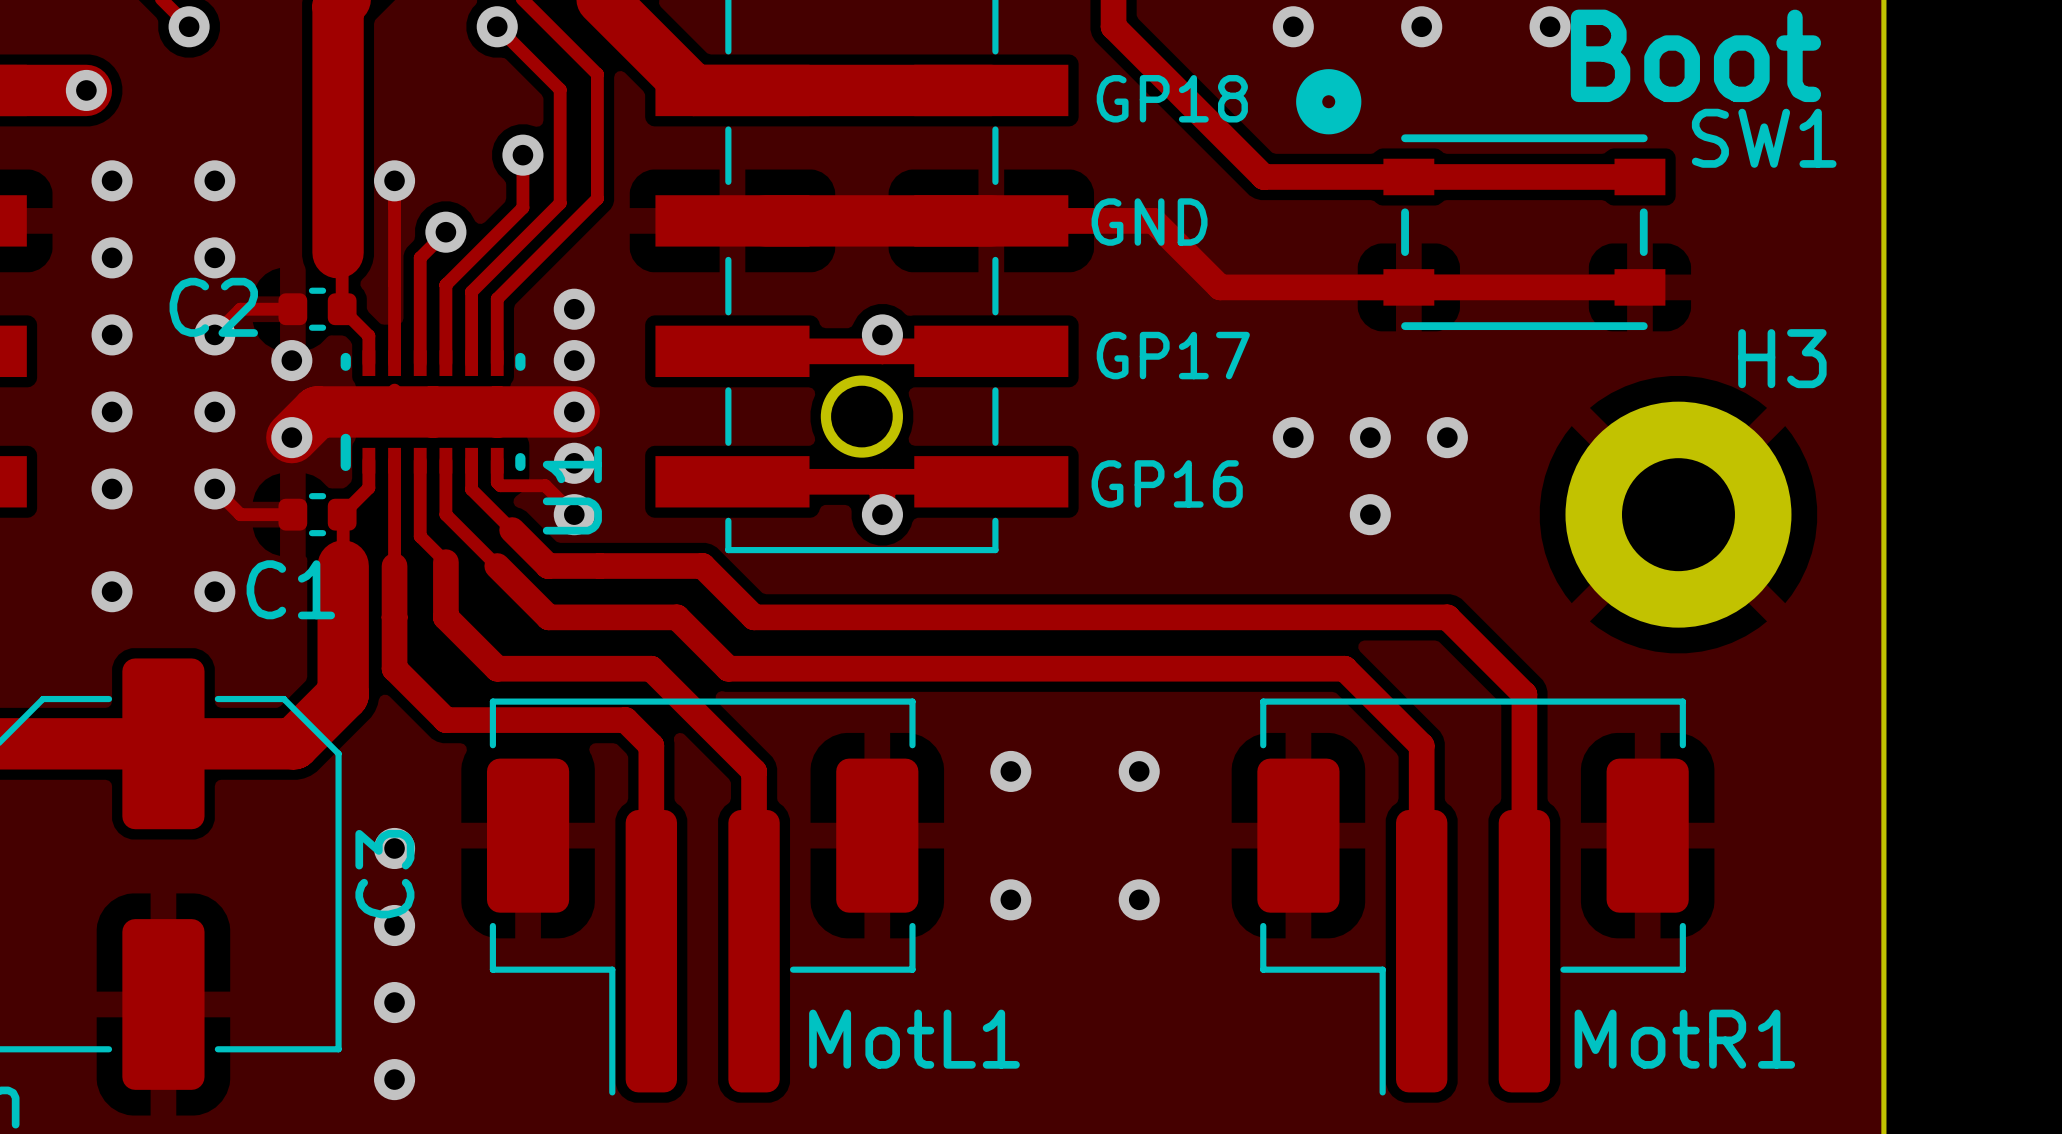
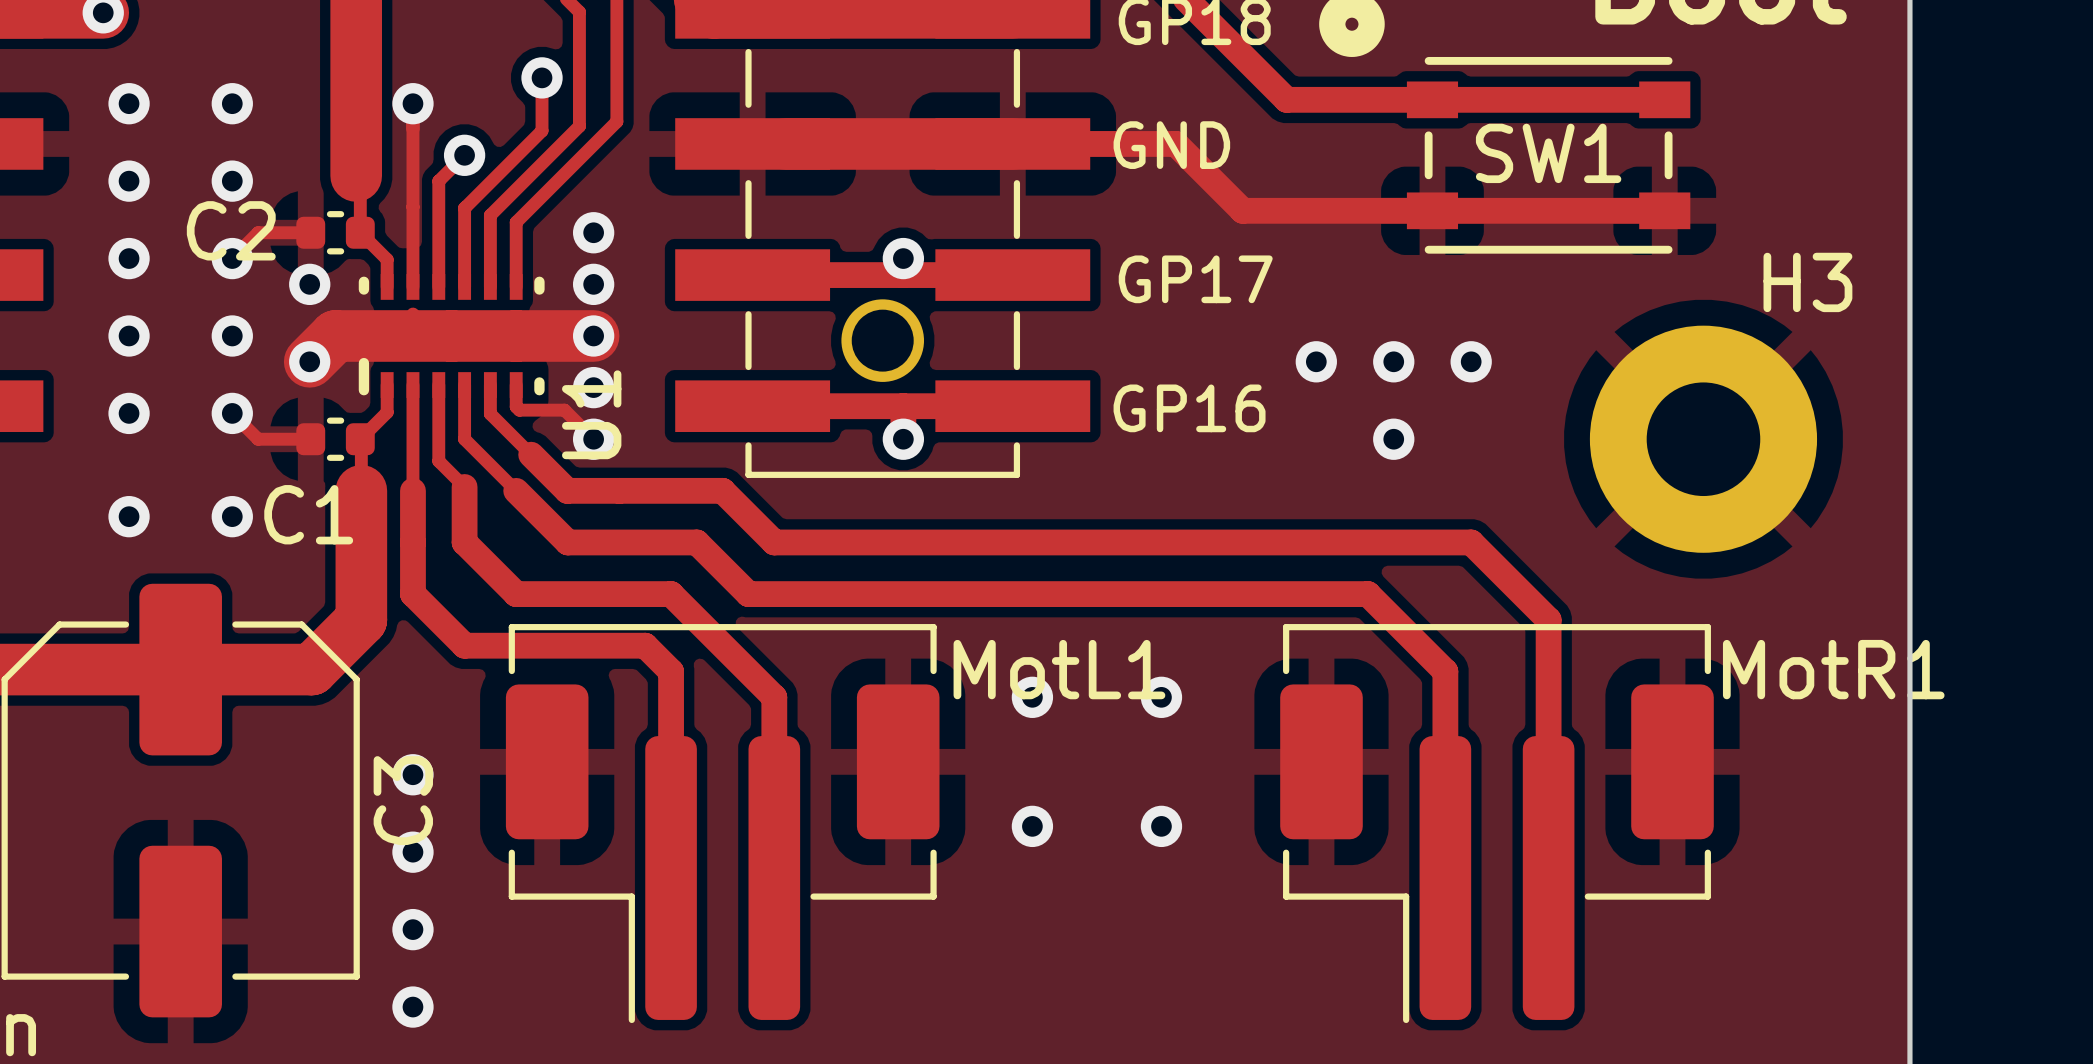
SW1 name position: SW1 (1764, 138) -> SW1 (1548, 153)
MotL1 name position: MotL1 (914, 1039) -> MotL1 (1059, 669)
MotR1 name position: MotR1 (1684, 1039) -> MotR1 (1833, 669)

